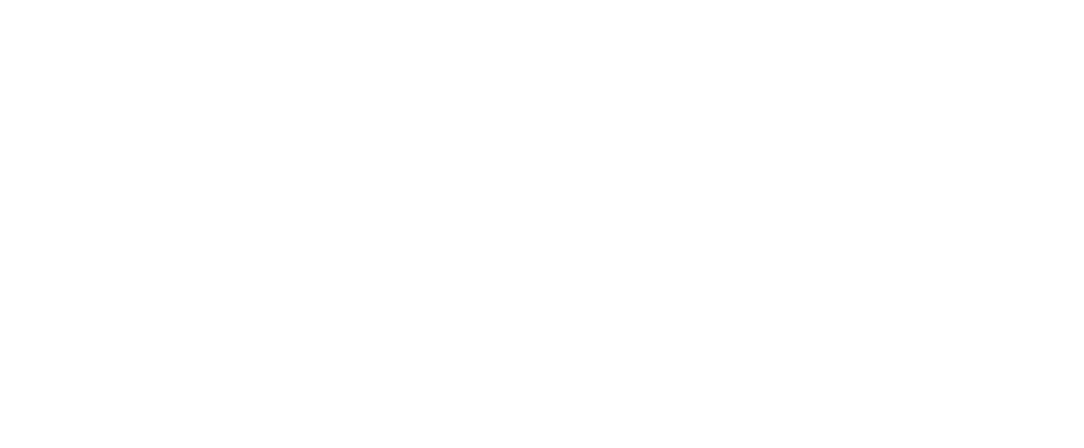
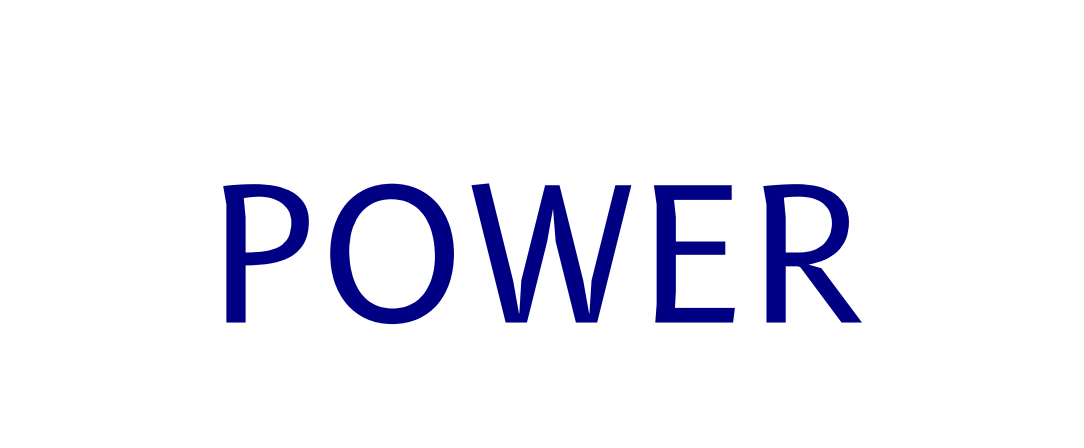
text: none -> POWER (542, 253)

